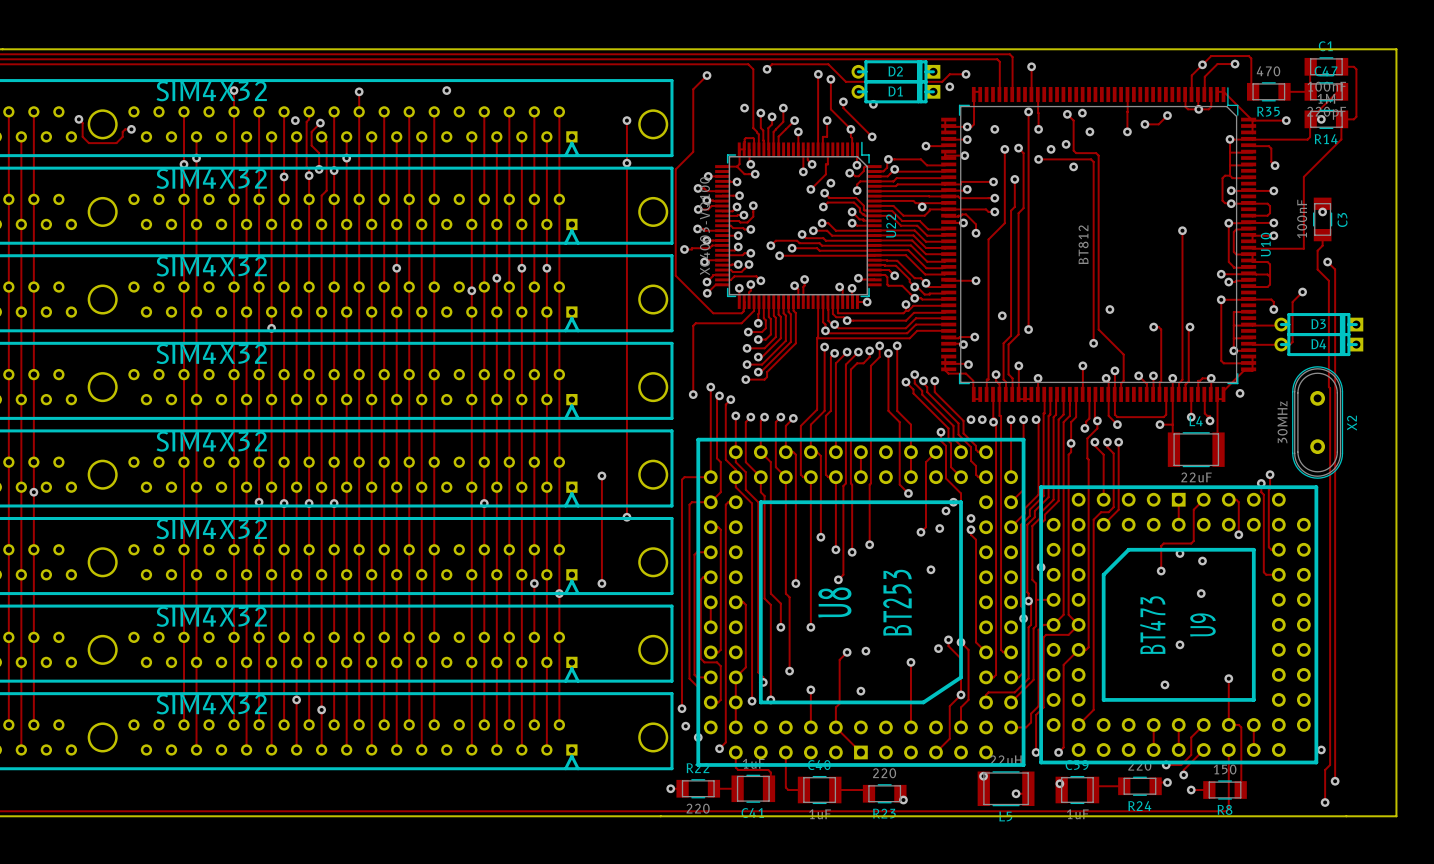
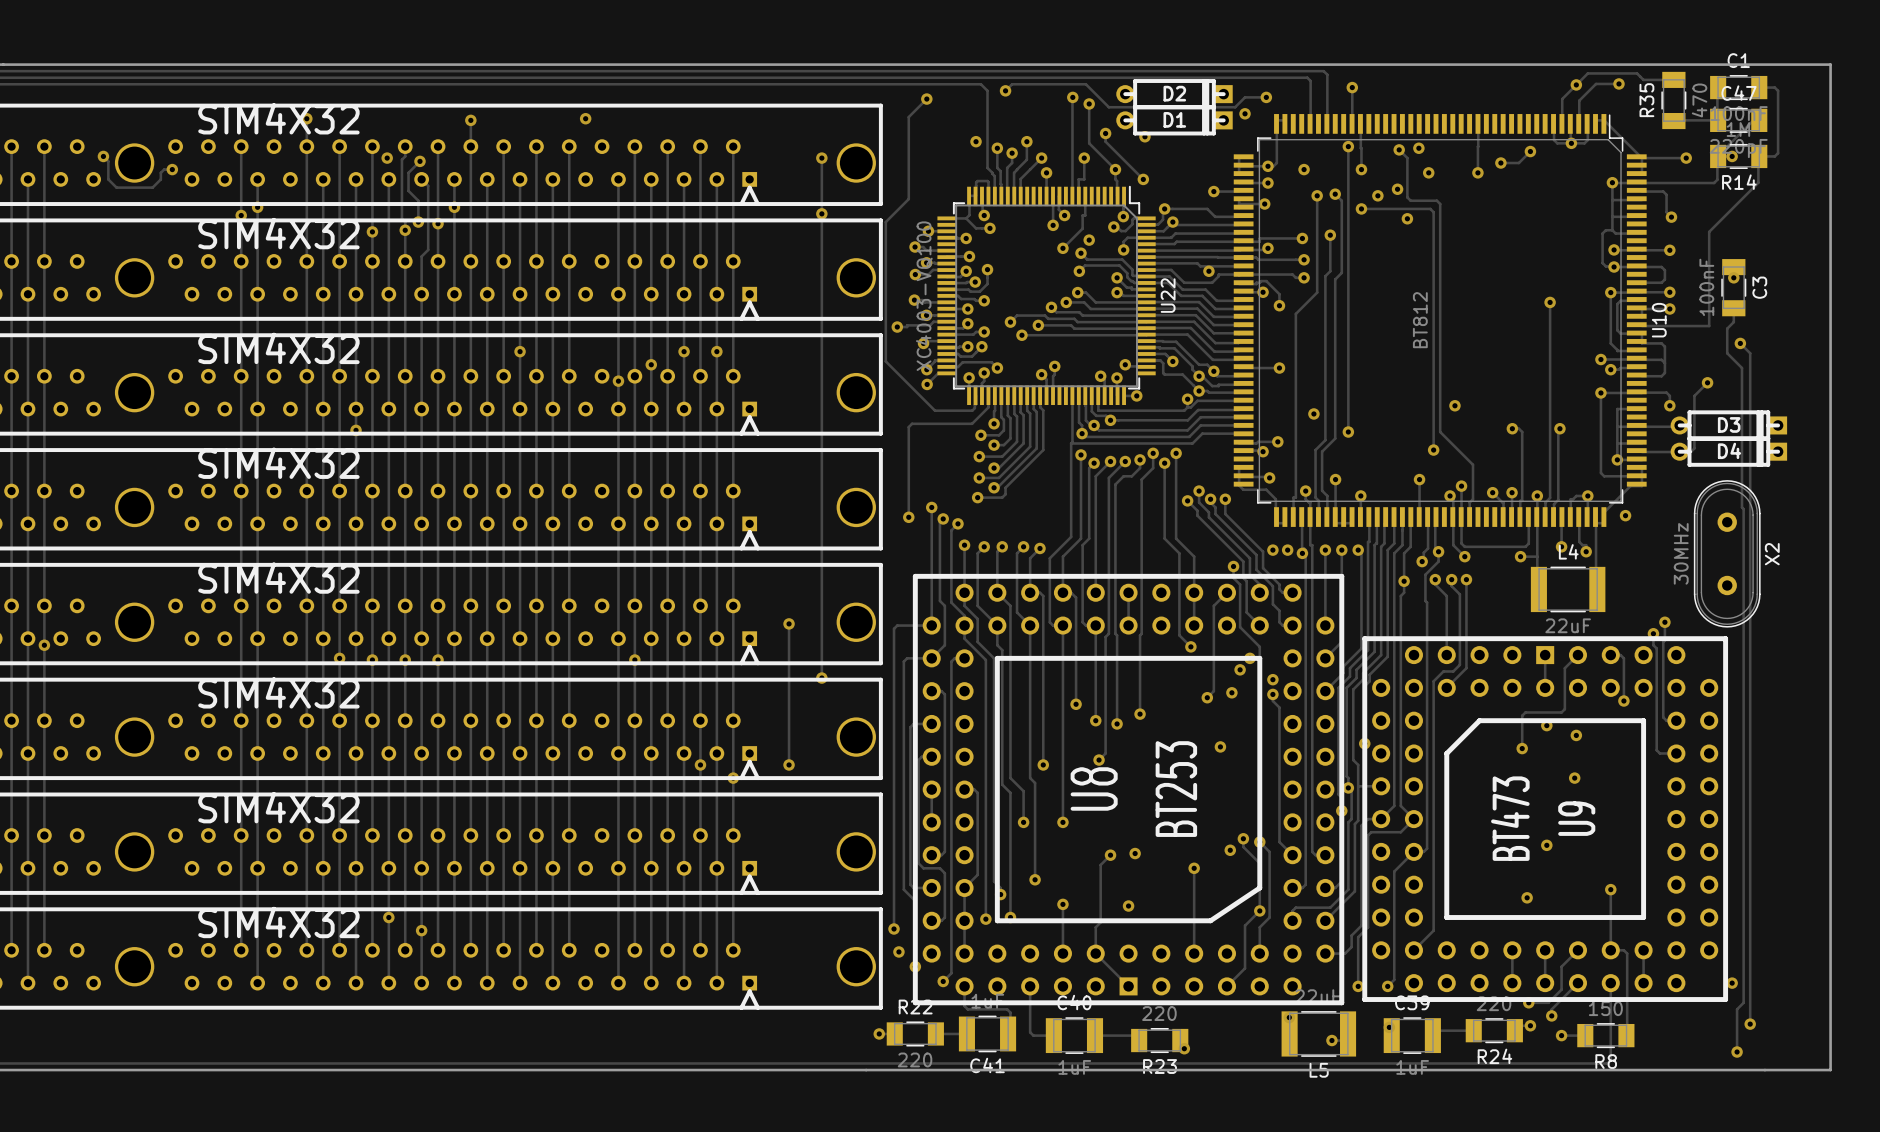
track: (1251, 58) (1252, 91) -> (1640, 76) (1643, 79) (1673, 79)
R35 rotation: 0° (1268, 91) -> 90° clockwise (1673, 100)

